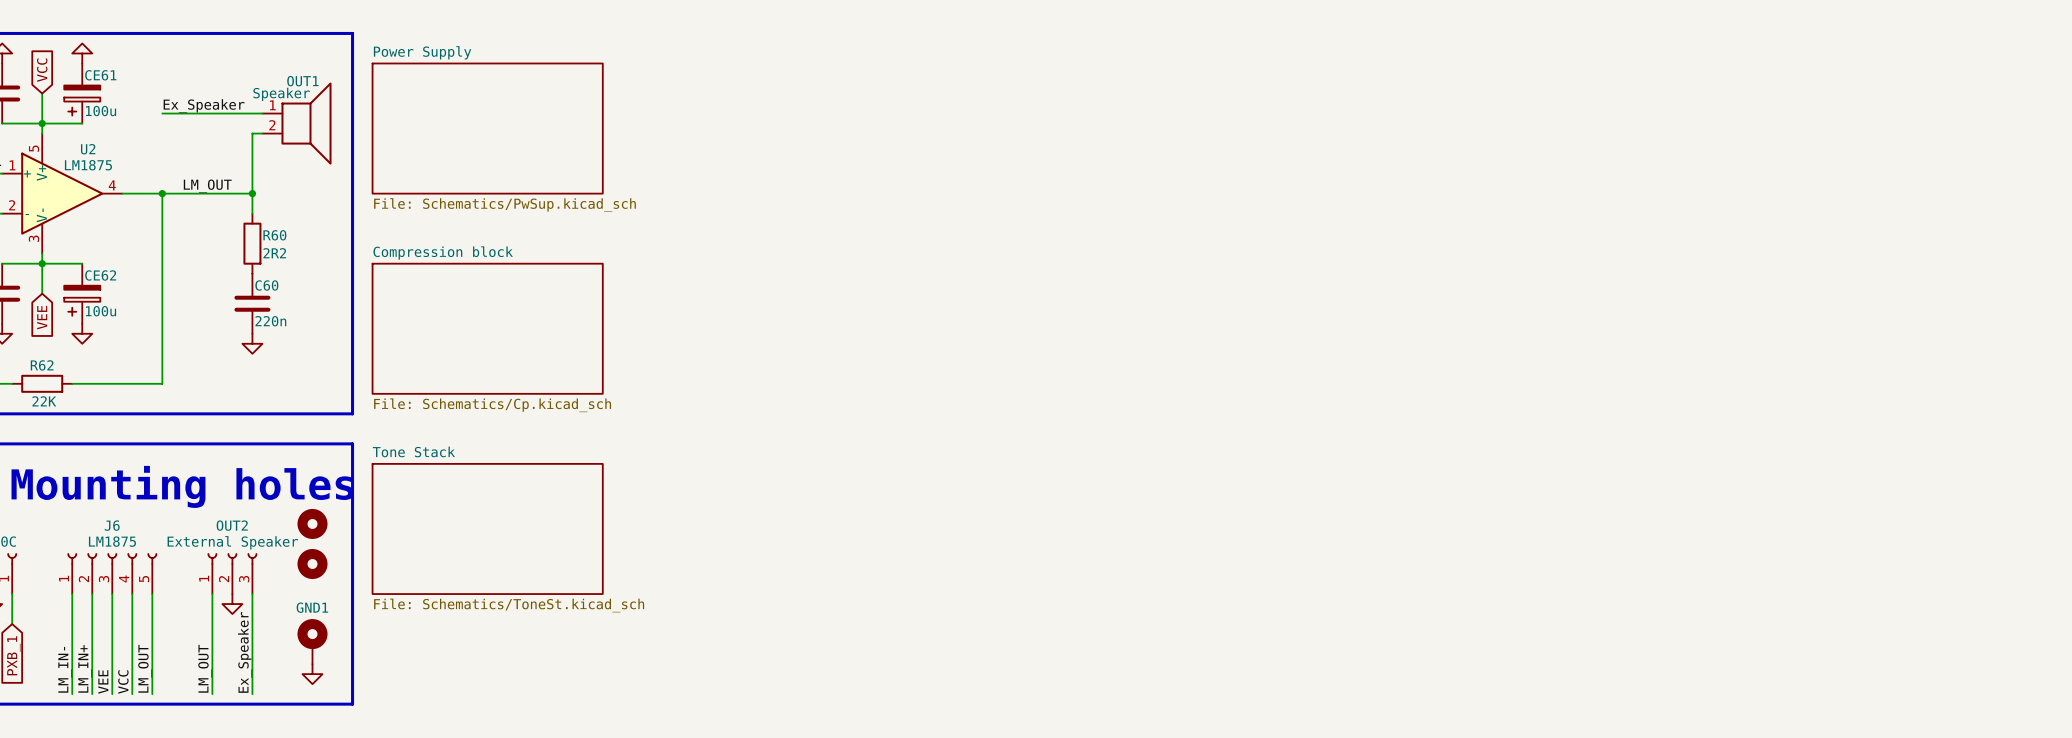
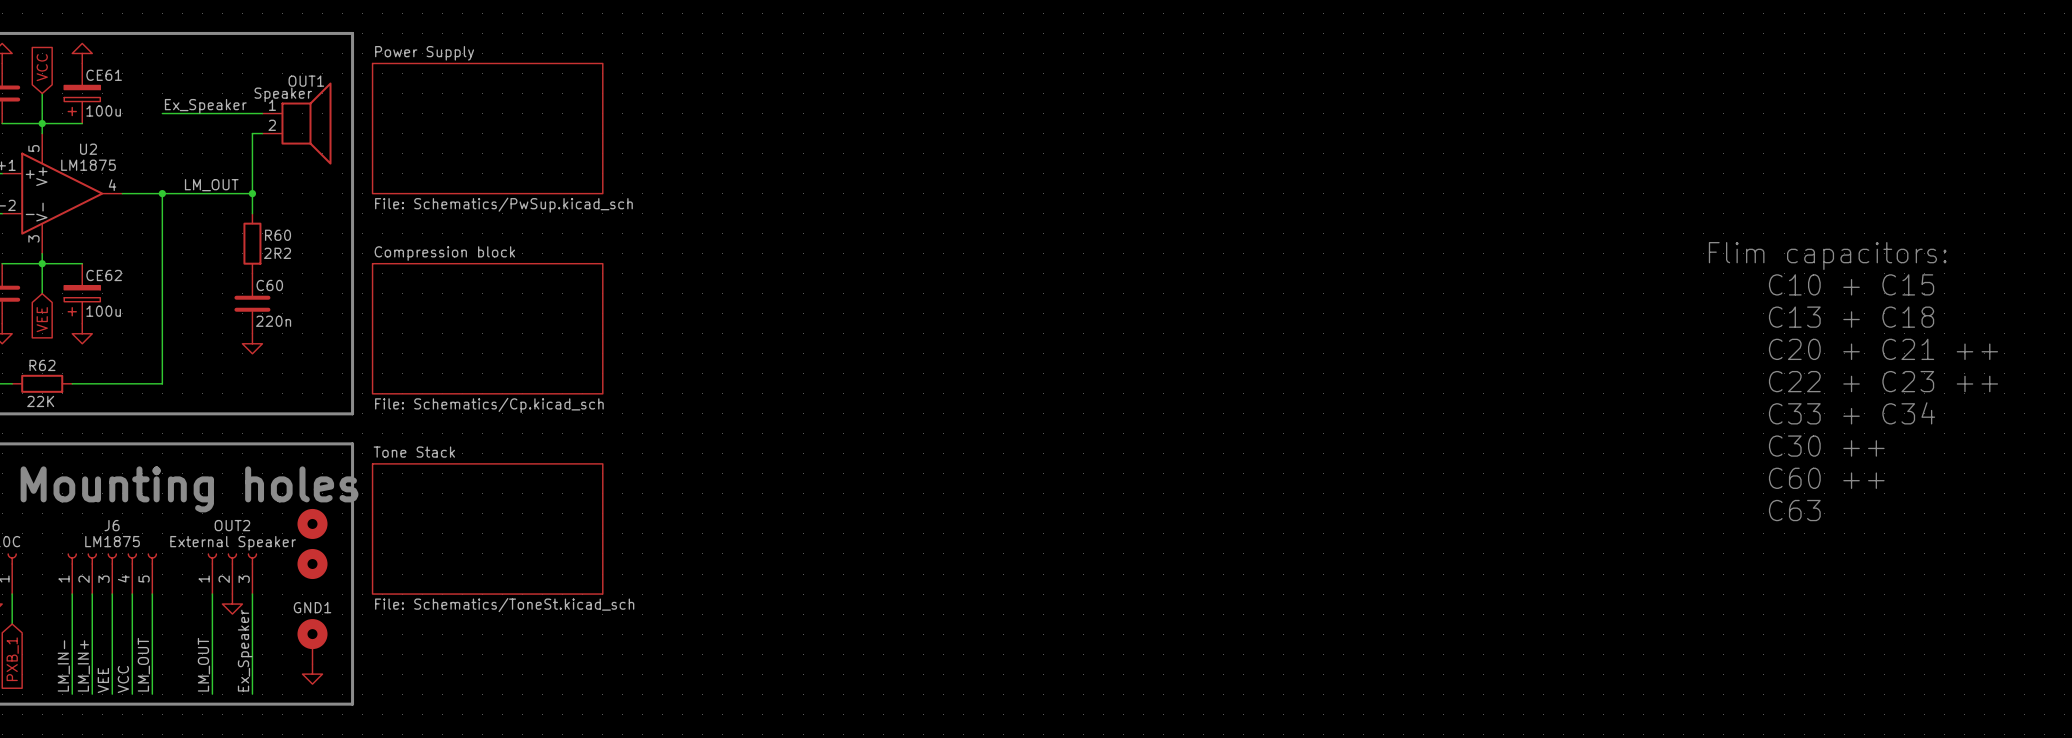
text: none -> Flim capacitors: (1827, 256)
text: none -> C10 + C15 (1851, 284)
text: none -> C13 + C18 (1851, 317)
text: none -> C20 + C21 ++ (1883, 349)
text: none -> C22 + C23 ++ (1883, 381)
text: none -> C33 + C34 (1852, 413)
text: none -> C30 ++ (1826, 446)
text: none -> C60 ++ (1826, 478)
text: none -> C63 (1794, 510)

